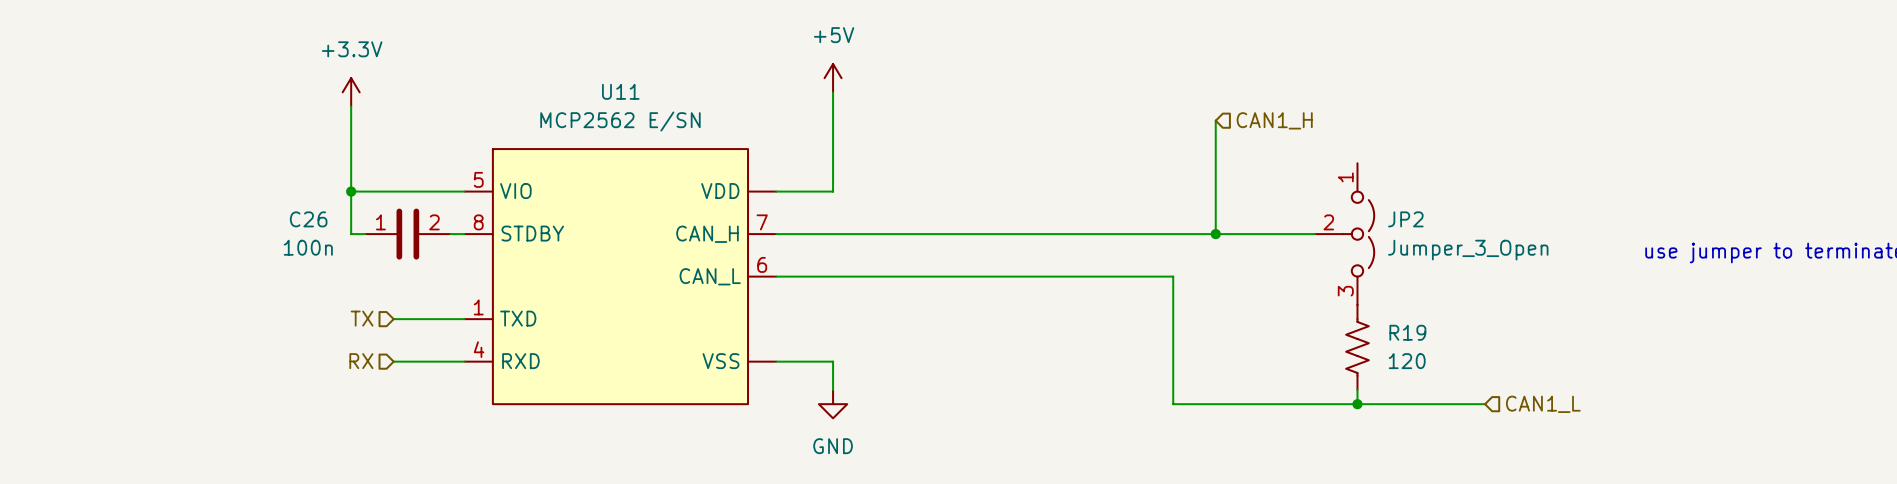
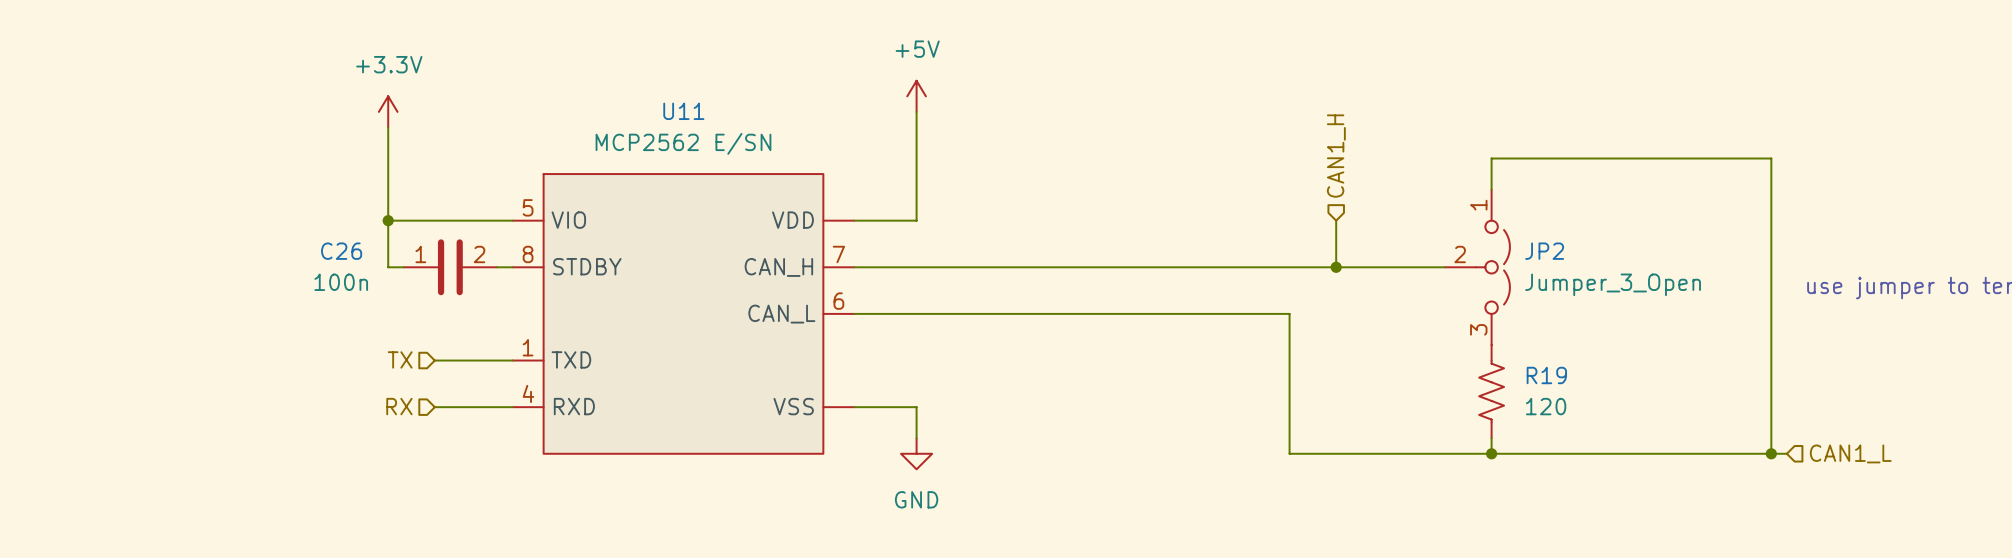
wire: (1215, 120) (1215, 191) -> none
hierarchical label rotation: 0° (1274, 120) -> 90° counterclockwise (1336, 156)
wire: none -> (1491, 189) (1491, 158) (1771, 158) (1771, 453)
wire: none -> (1631, 453) (1786, 453)
hierarchical label position: CAN1_L (1543, 404) -> CAN1_L (1850, 453)
junction: none -> (1771, 453)

